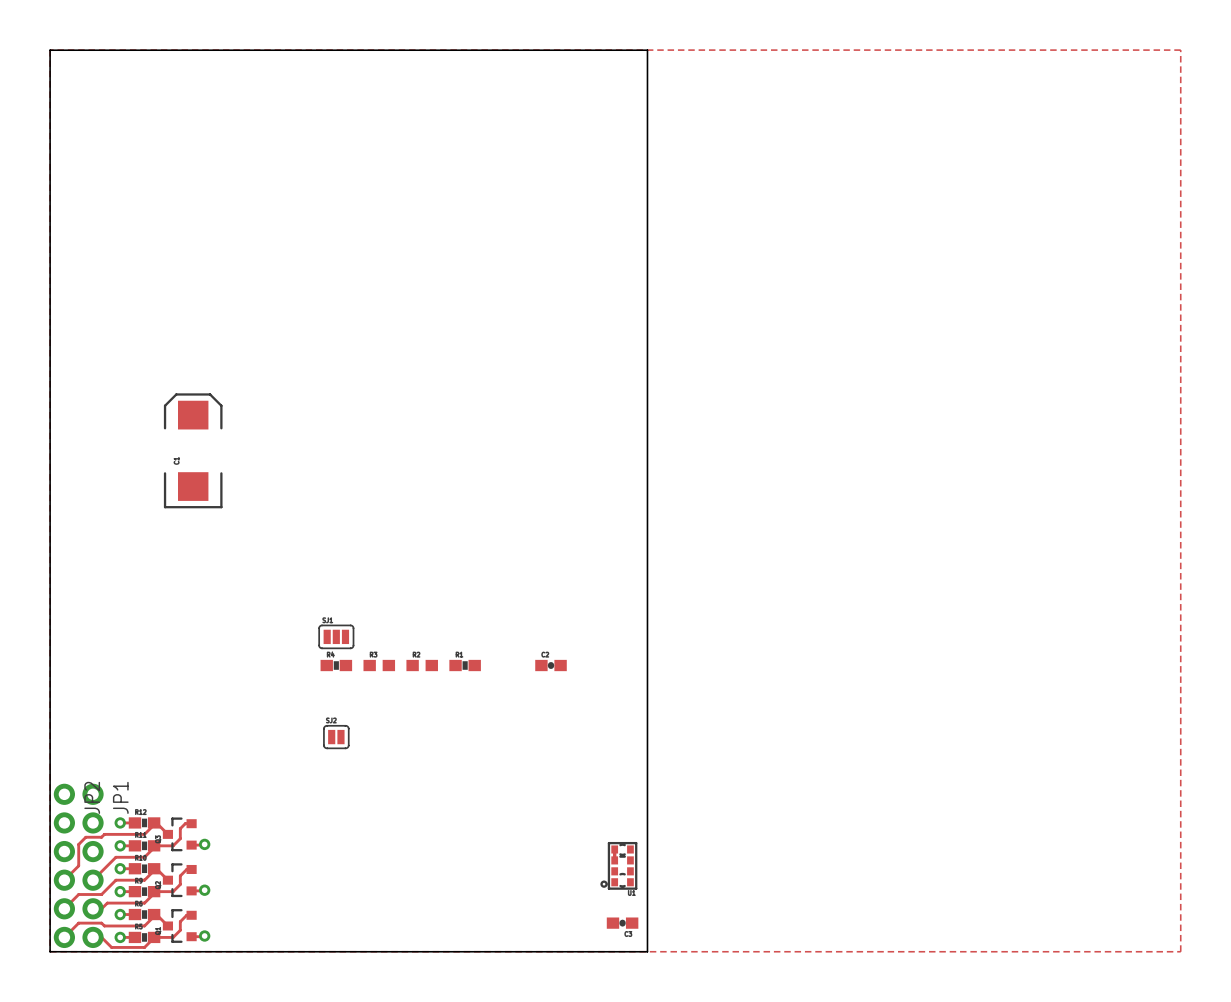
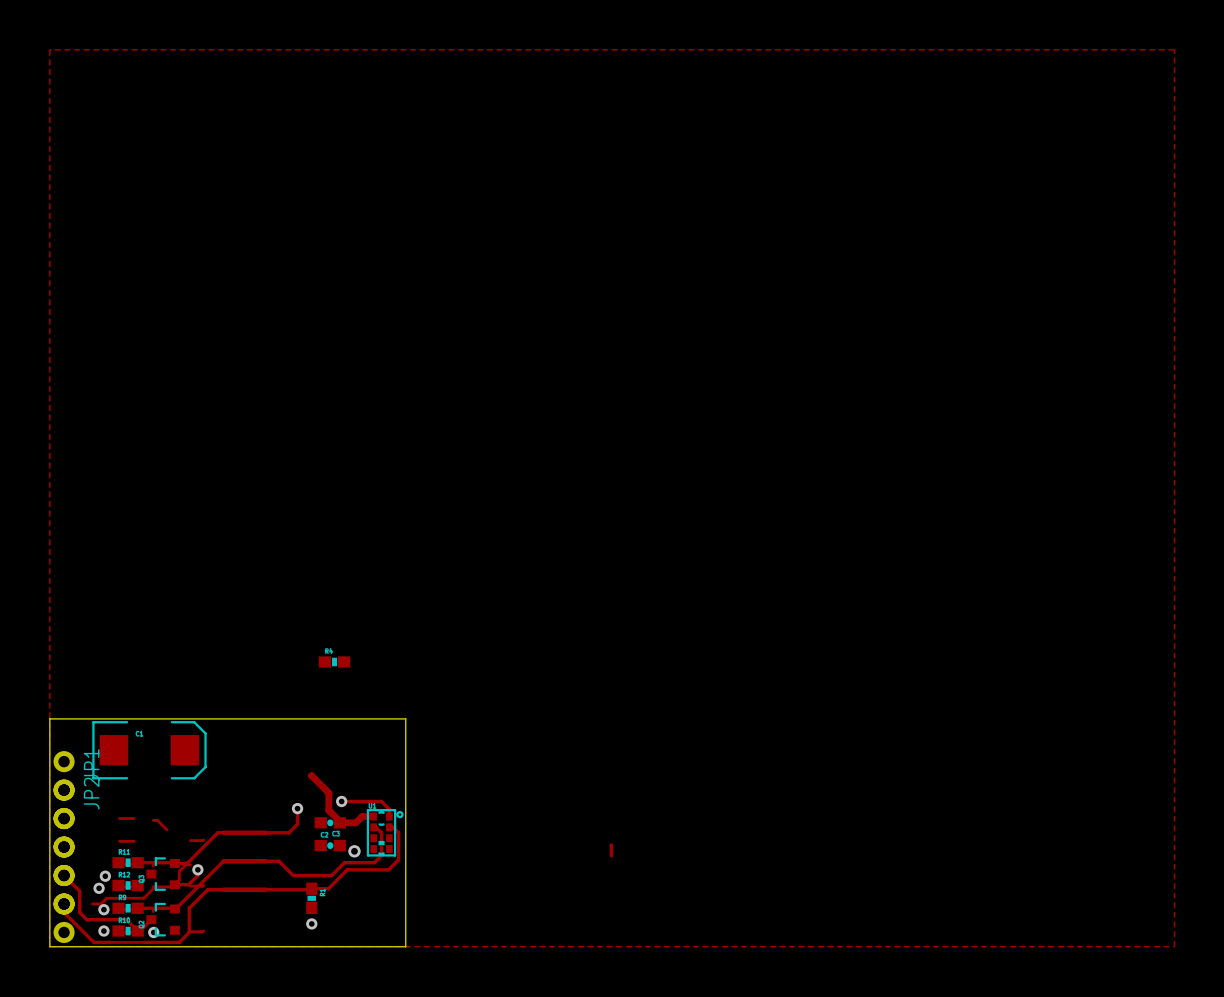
part rotation: 0° (193, 450) -> 90° clockwise (149, 750)
part position: (193, 450) -> (149, 750)
part: (336, 636) -> none
part: (379, 665) -> none
part: (422, 665) -> none
part rotation: 0° (465, 665) -> 90° clockwise (311, 898)
part position: (465, 665) -> (311, 898)
part position: (551, 665) -> (330, 845)
board edge: (50, 722) (50, 50) (647, 50) (647, 951) (407, 951) -> (49, 718) (405, 718) (405, 946)
part: (336, 737) -> none
track: none -> (311, 775) (328, 792) (328, 810) (339, 822) (355, 822) (362, 816) (373, 816)
track: none -> (341, 801) (381, 801) (389, 809) (389, 816)
via: none -> (341, 801)
track: none -> (297, 808) (297, 824) (288, 832) (217, 832) (187, 863) (137, 862)
via: none -> (297, 808)
via: (120, 822) -> none
part position: (144, 822) -> (128, 885)
track: (154, 822) (144, 834) (104, 834) (101, 837) (85, 837) (78, 844) (78, 865) (64, 880) -> (151, 919) (139, 931) (126, 919) (86, 919) (79, 912) (79, 891) (64, 875)
track: (191, 823) (185, 823) (180, 828) (180, 838) (173, 845) (154, 845) (144, 857) (115, 857) (93, 880) -> none
track: none -> (373, 827) (381, 832) (381, 855) (374, 862) (344, 862) (331, 875) (293, 875) (279, 861) (223, 861) (175, 908) (137, 908)
part position: (179, 834) -> (163, 874)
via: (204, 844) -> none
via: (120, 845) -> none
part position: (144, 845) -> (128, 862)
via: none -> (354, 851)
JP1 position: (93, 865) -> (64, 832)
part rotation: 0° (618, 865) -> 180° (385, 832)
part position: (618, 865) -> (385, 832)
via: (120, 868) -> none
part position: (144, 868) -> (128, 931)
track: none -> (197, 869) (197, 875) (188, 884) (174, 884)
via: none -> (197, 869)
via: none -> (105, 876)
track: (167, 880) (158, 870) (154, 870) (144, 880) (115, 880) (101, 894) (78, 894) (64, 908) -> none
part position: (179, 880) -> (163, 919)
via: (204, 890) -> none
via: (120, 891) -> none
part position: (144, 891) -> (128, 908)
via: none -> (99, 888)
via: none -> (103, 909)
via: (120, 914) -> none
part: (144, 914) -> none
track: (191, 915) (186, 915) (180, 921) (180, 930) (173, 937) (154, 937) (144, 947) -> (389, 827) (393, 827) (398, 832) (398, 859) (388, 869) (347, 869) (328, 888) (207, 889) (189, 908) (189, 932) (179, 942) (143, 942)
part position: (622, 923) -> (330, 822)
track: (167, 925) (158, 916) (154, 916) (144, 925) (104, 925) (101, 923) (78, 923) (64, 937) -> none
part: (179, 925) -> none
via: none -> (311, 923)
via: none -> (103, 931)
via: (204, 936) -> none
track: (93, 937) (101, 937) (111, 947) -> (64, 903) (64, 912) (93, 942) (111, 942)
via: (120, 937) -> none
part: (144, 937) -> none
via: none -> (153, 932)

